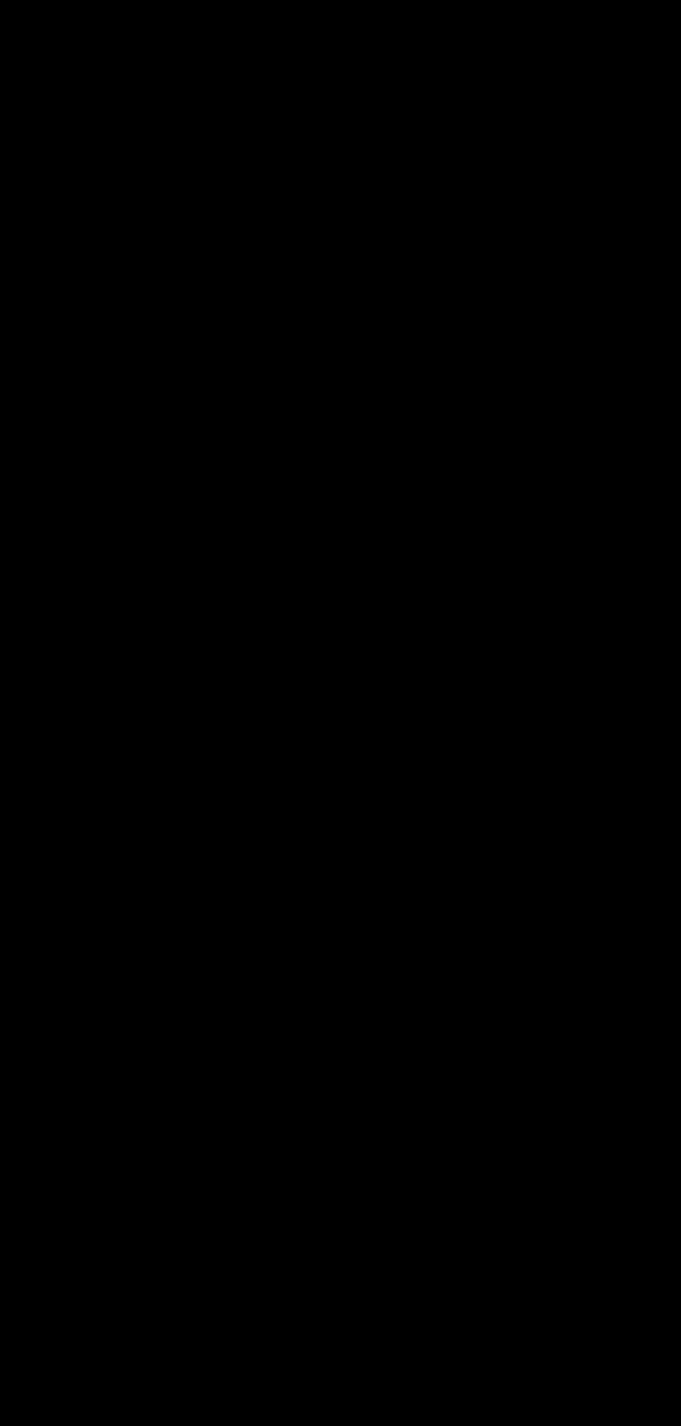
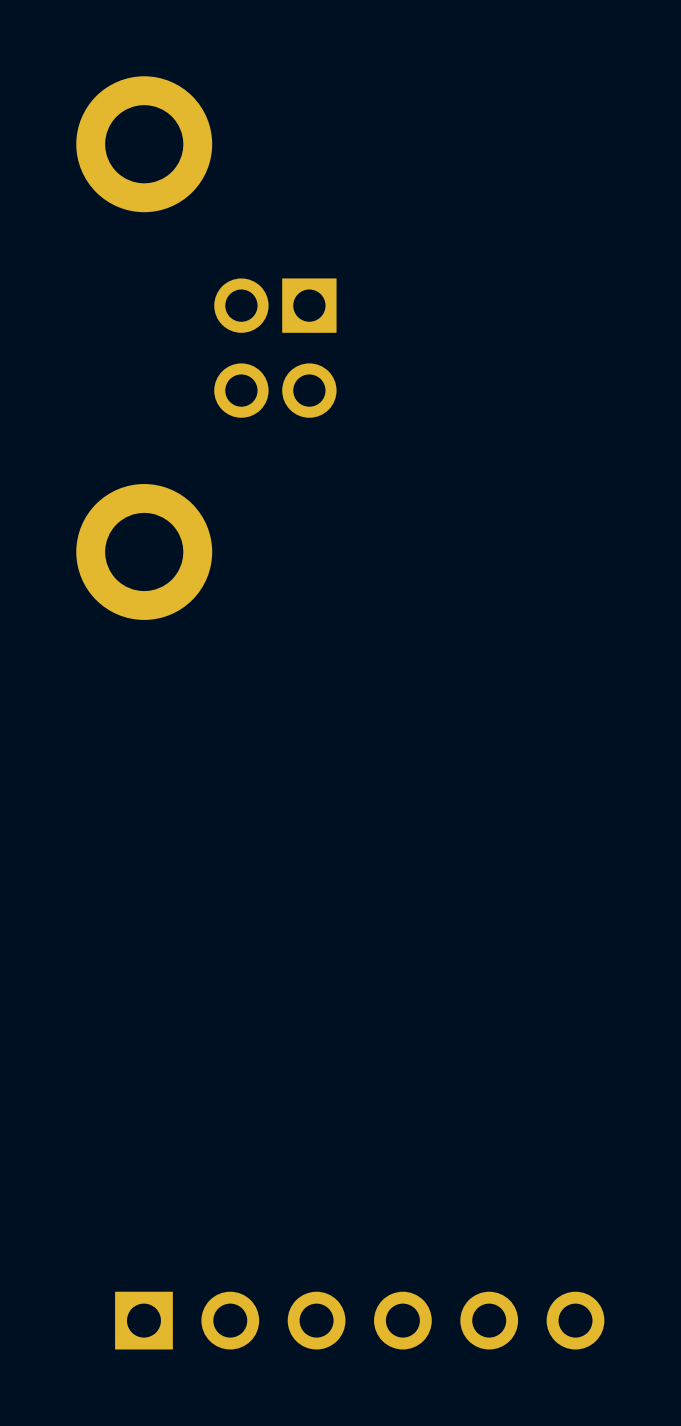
part: none -> (206, 348)
part: none -> (359, 1320)

